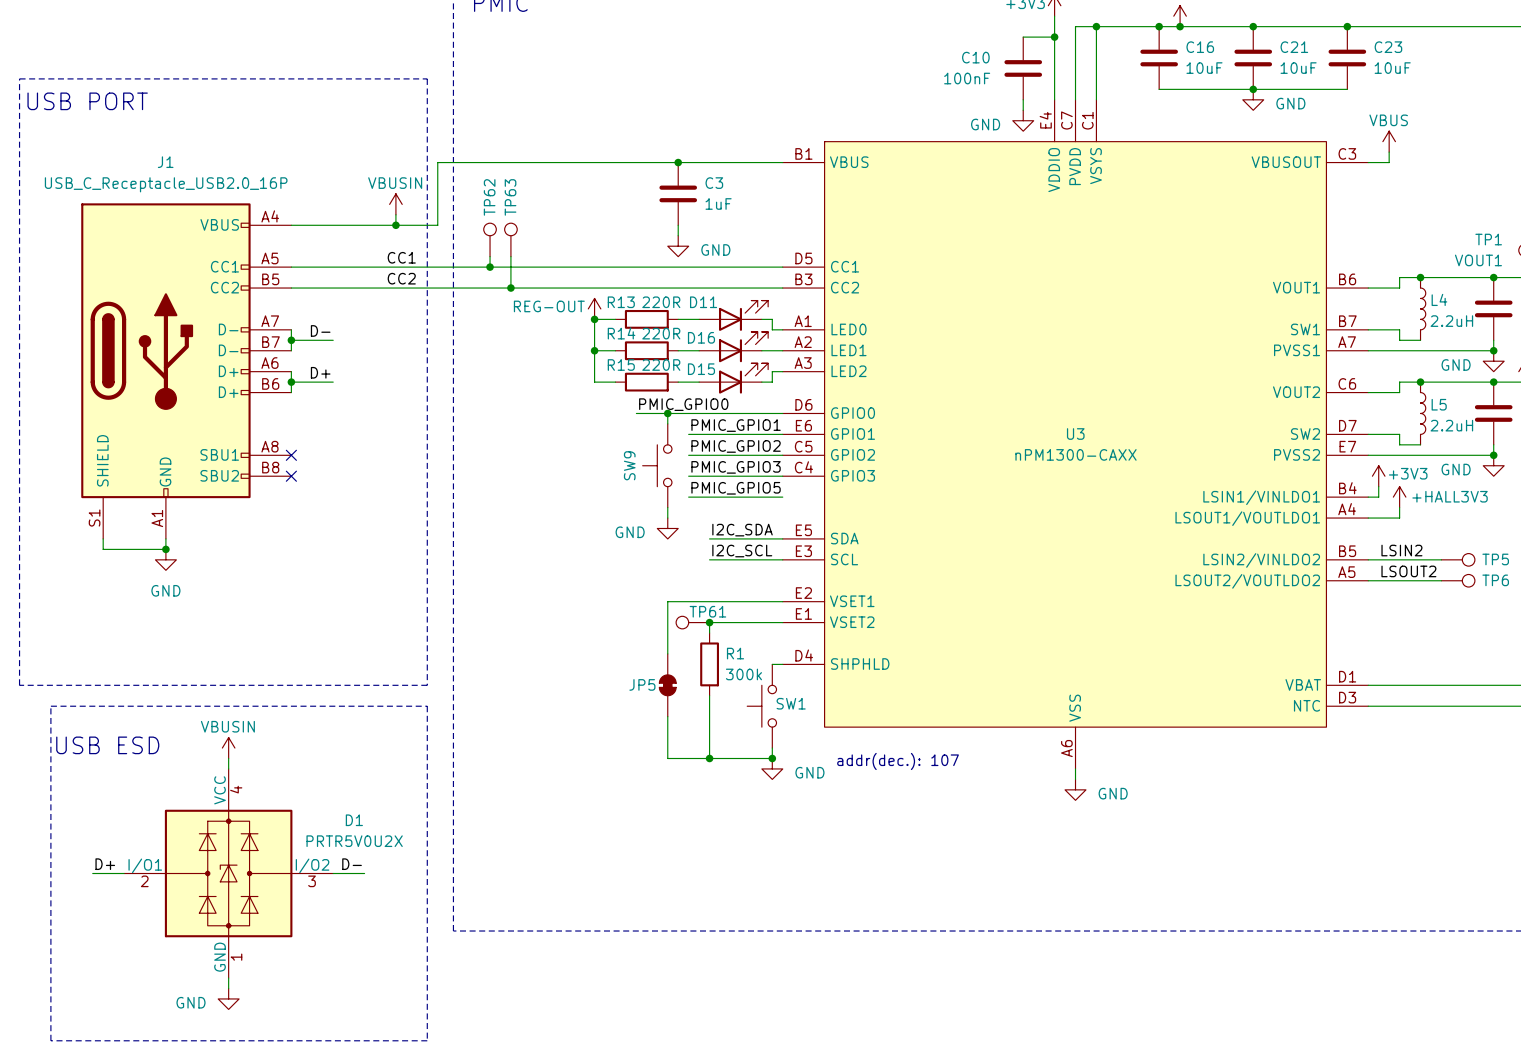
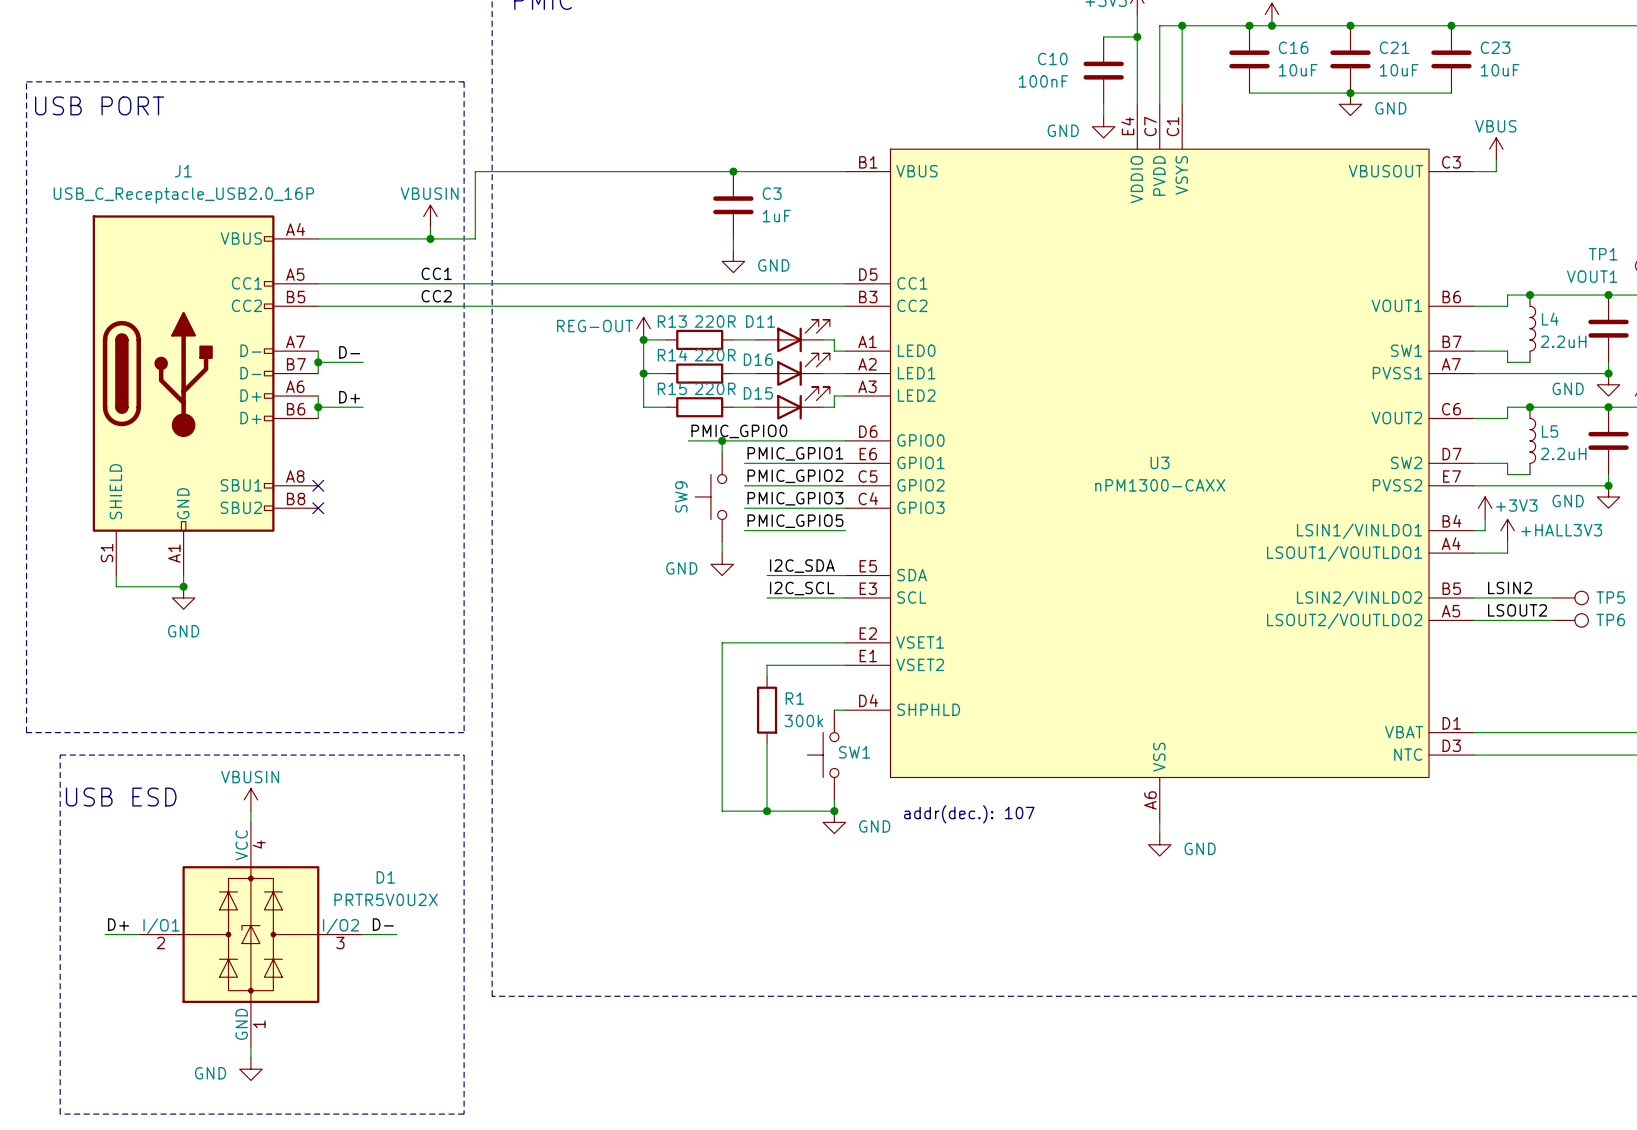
TP62: (490, 239) -> none
TP63: (510, 239) -> none
wire: (490, 256) (490, 267) -> none
wire: (510, 256) (510, 288) -> none
junction: (490, 267) -> none
junction: (510, 288) -> none
TP61: (692, 622) -> none
junction: (709, 622) -> none
JP5: (667, 685) -> none

